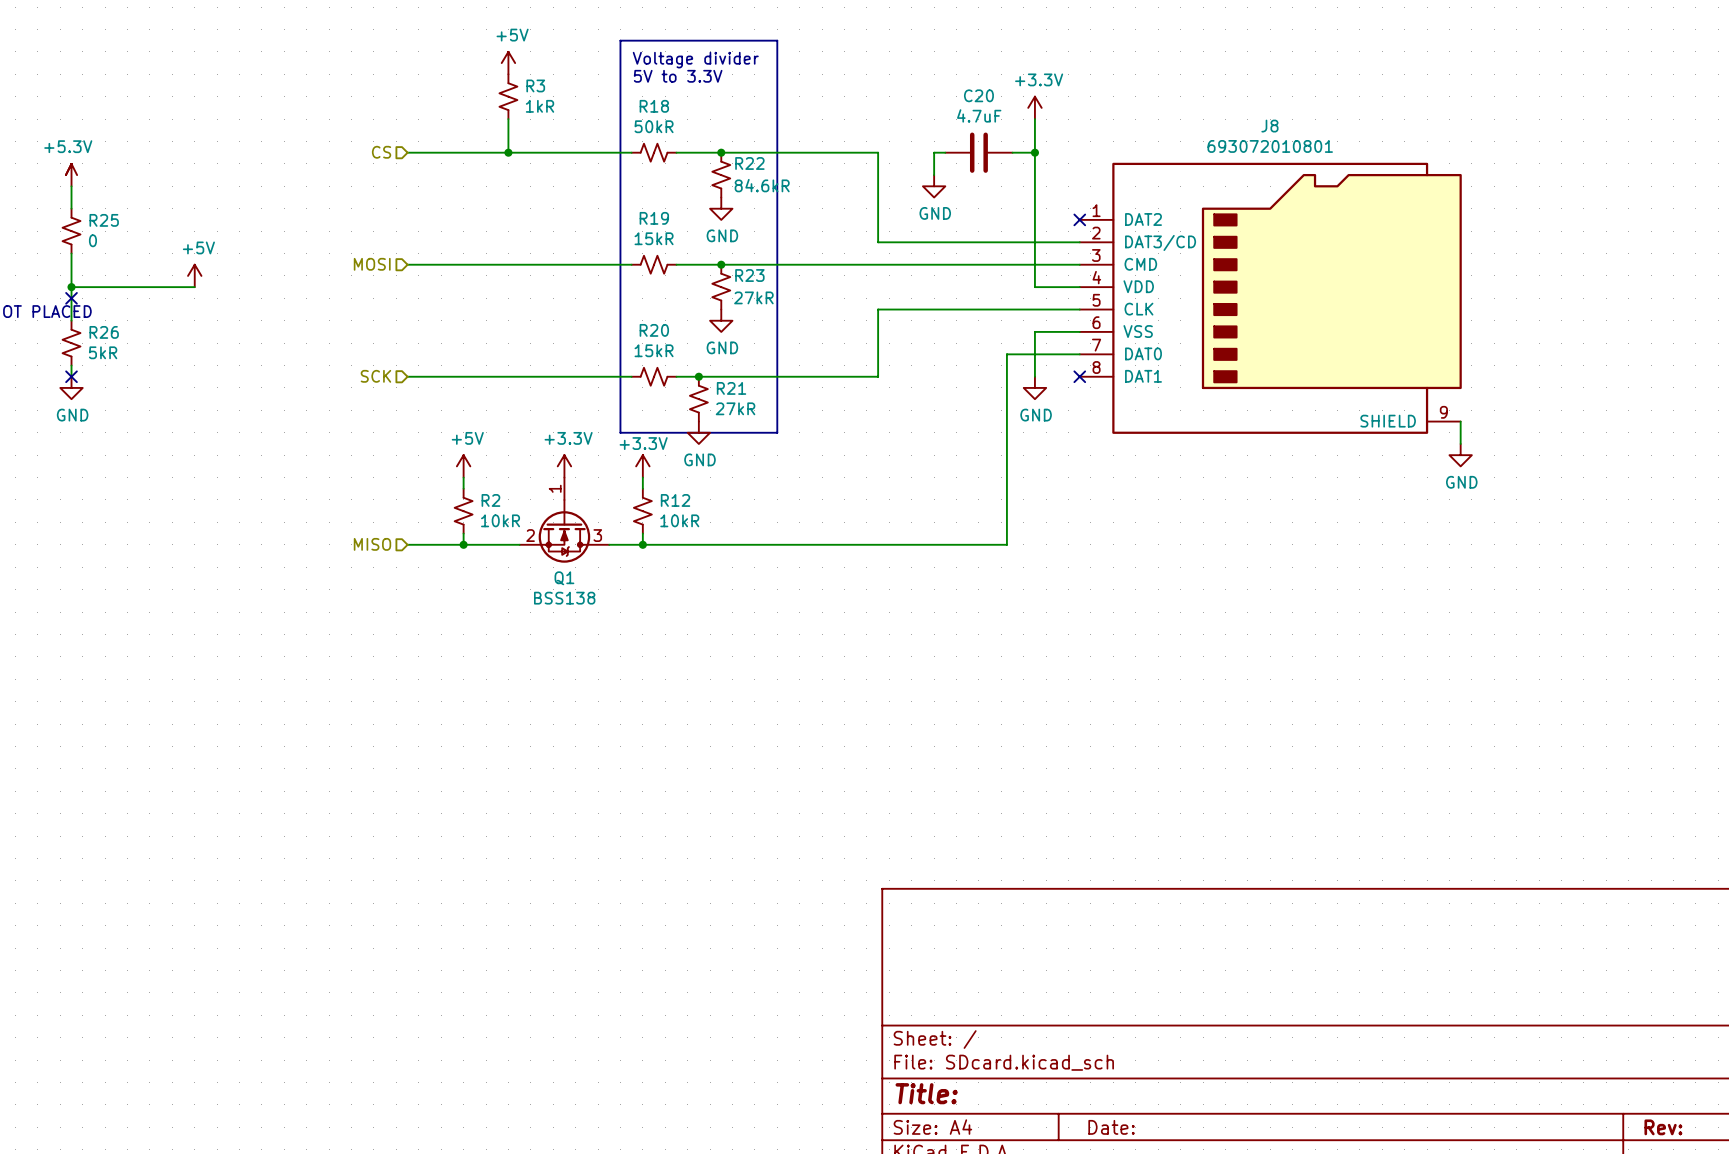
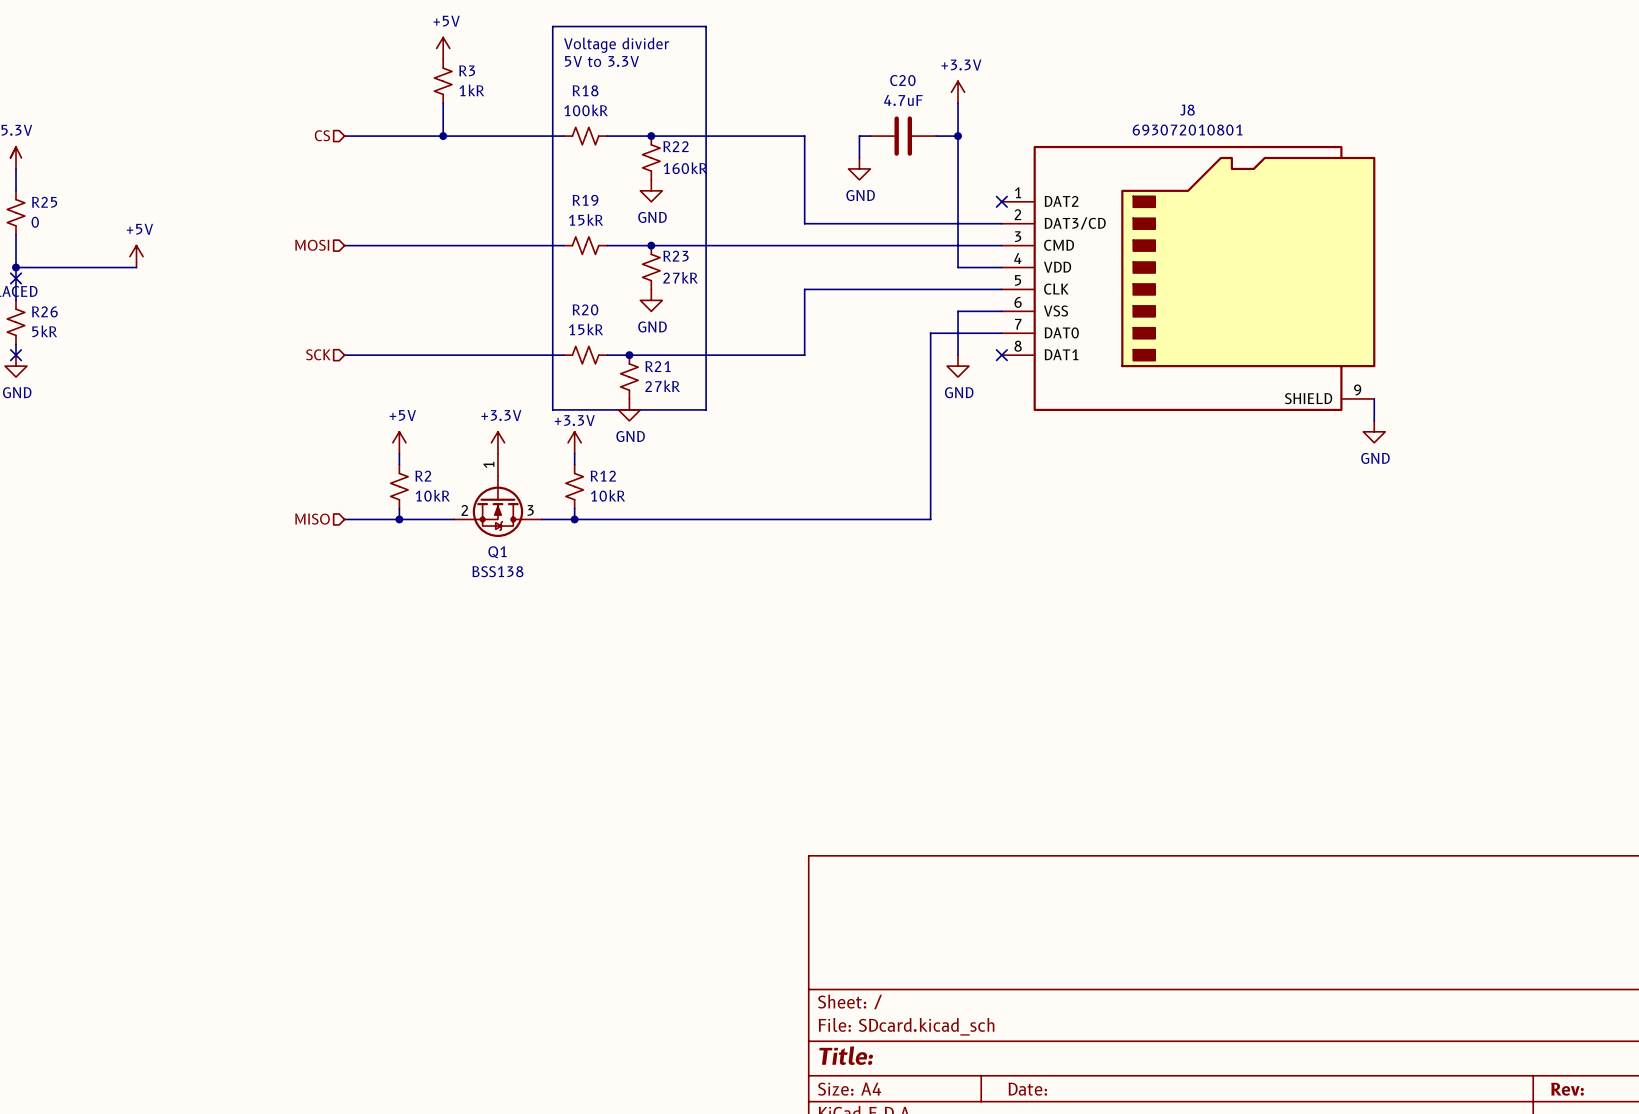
R18 value: 50kR (654, 126) -> 100kR (586, 110)
R22 value: 84.6kR (762, 185) -> 160kR (685, 168)

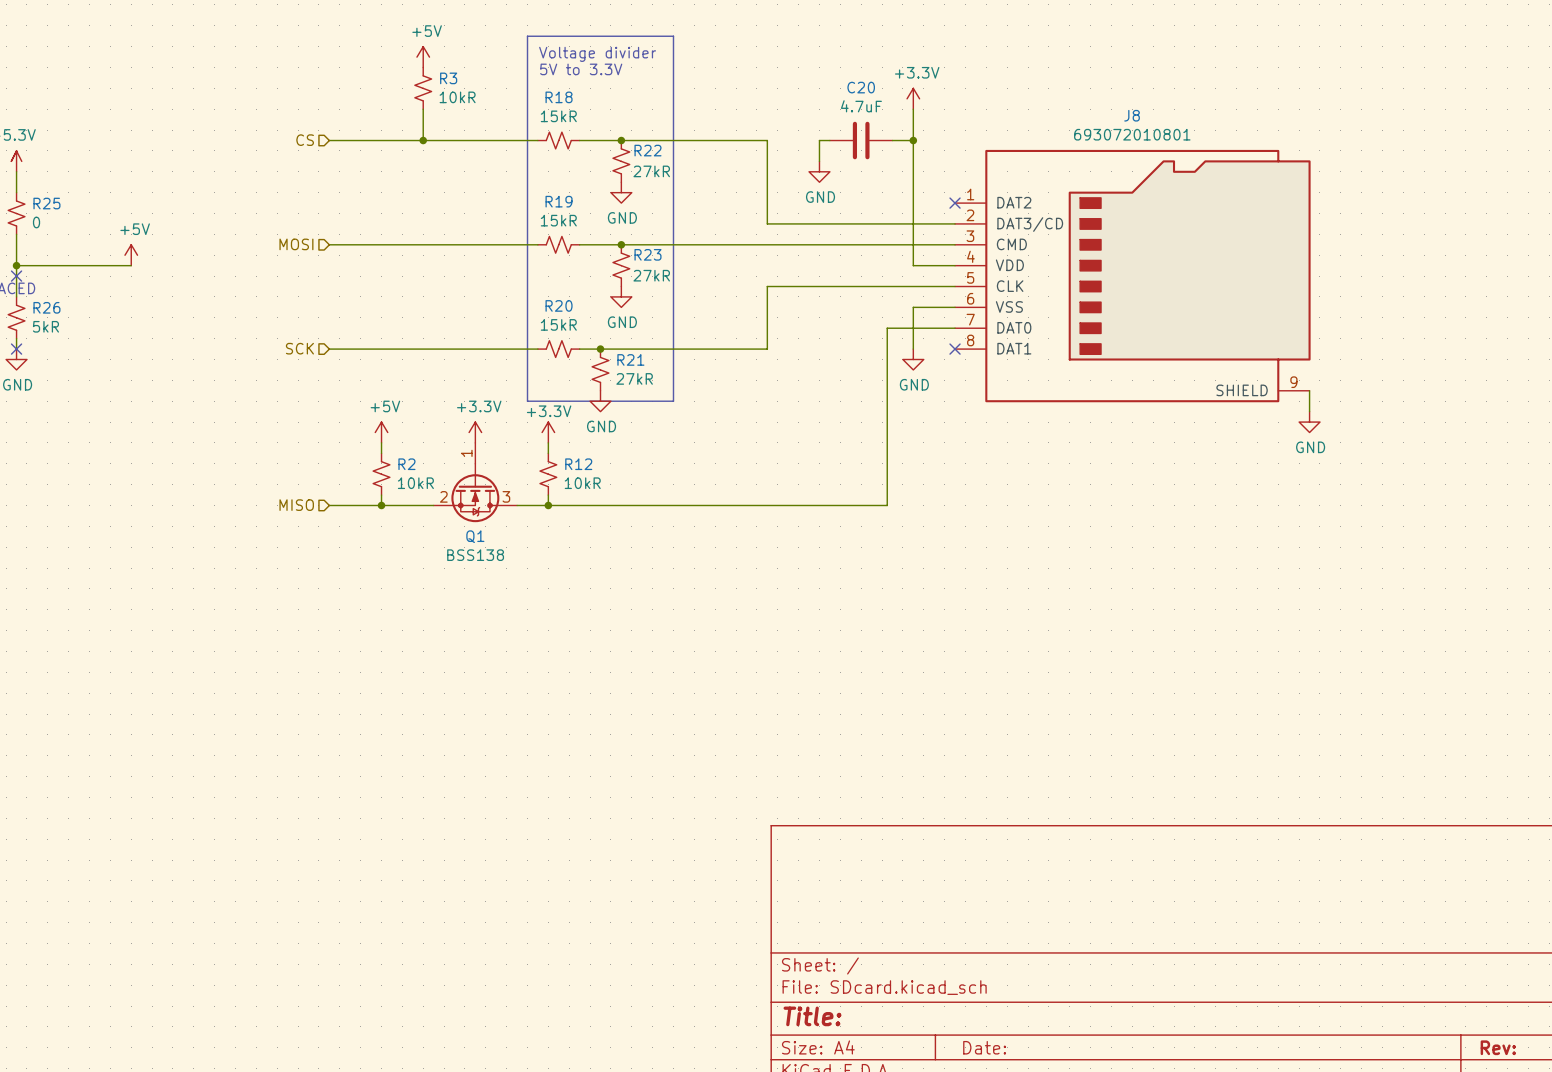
R3 value: 1kR (471, 90) -> 10kR (457, 97)
R18 value: 100kR (586, 110) -> 15kR (558, 116)
R22 value: 160kR (685, 168) -> 27kR (651, 171)

